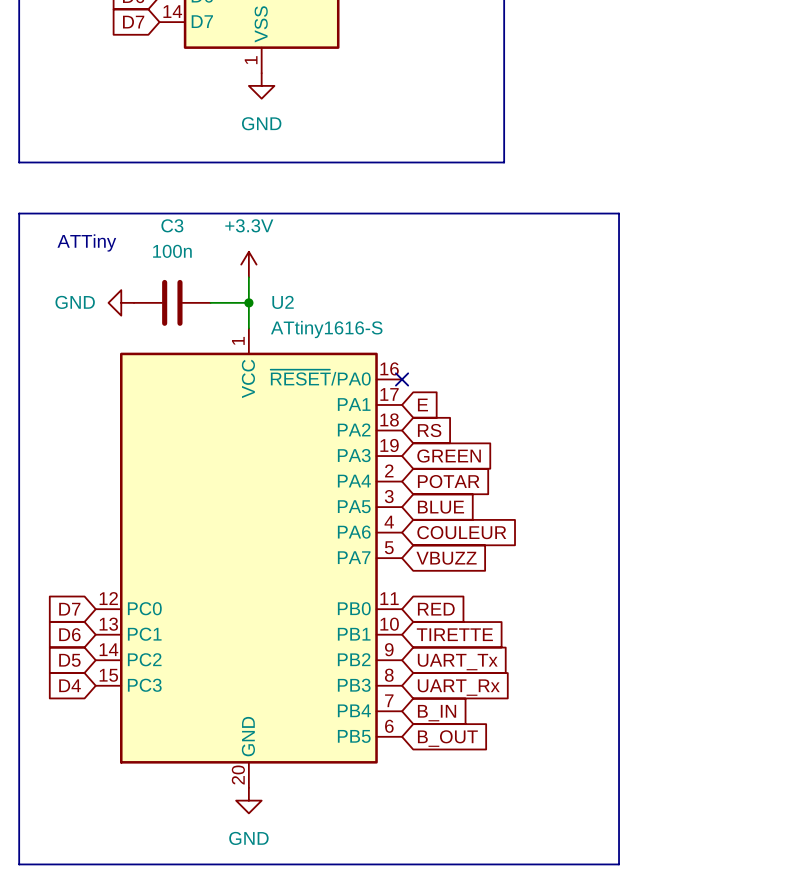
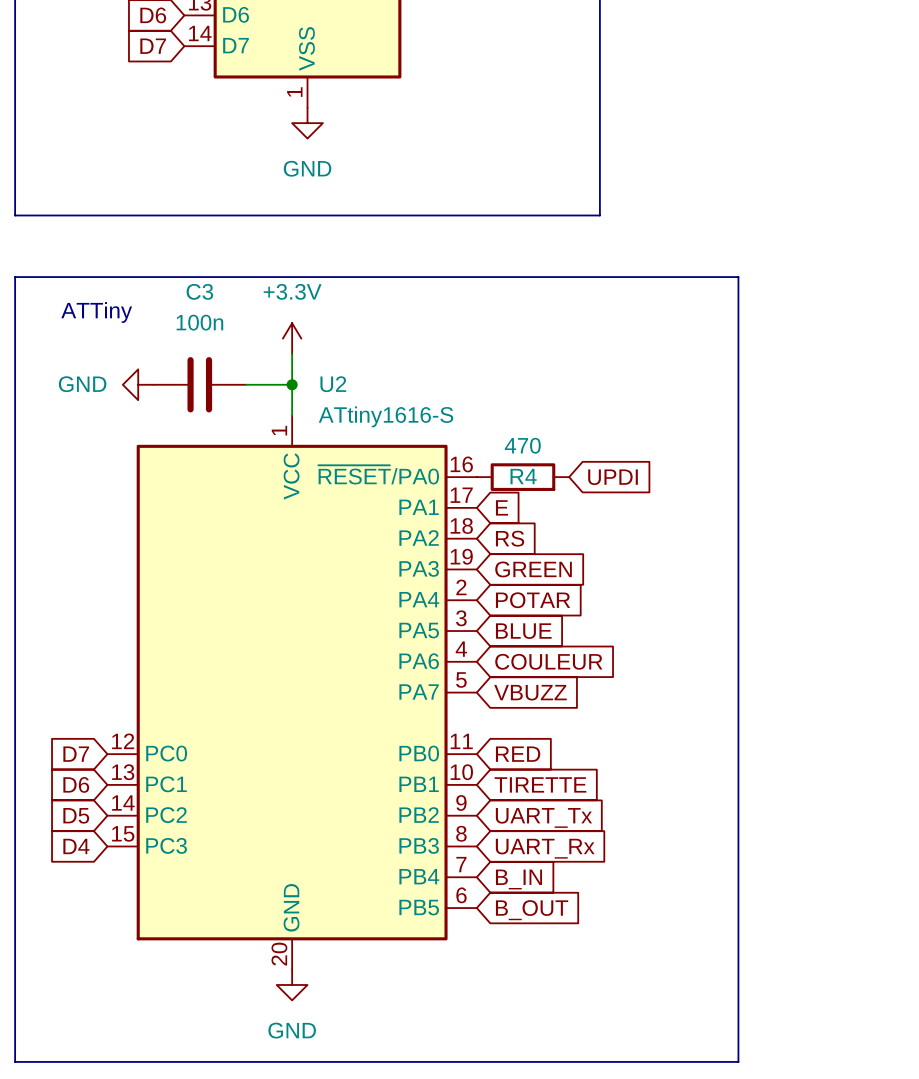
no-connect mark: (402, 379) -> none
R4: none -> 470 (522, 477)
global label: none -> UPDI (613, 477)

